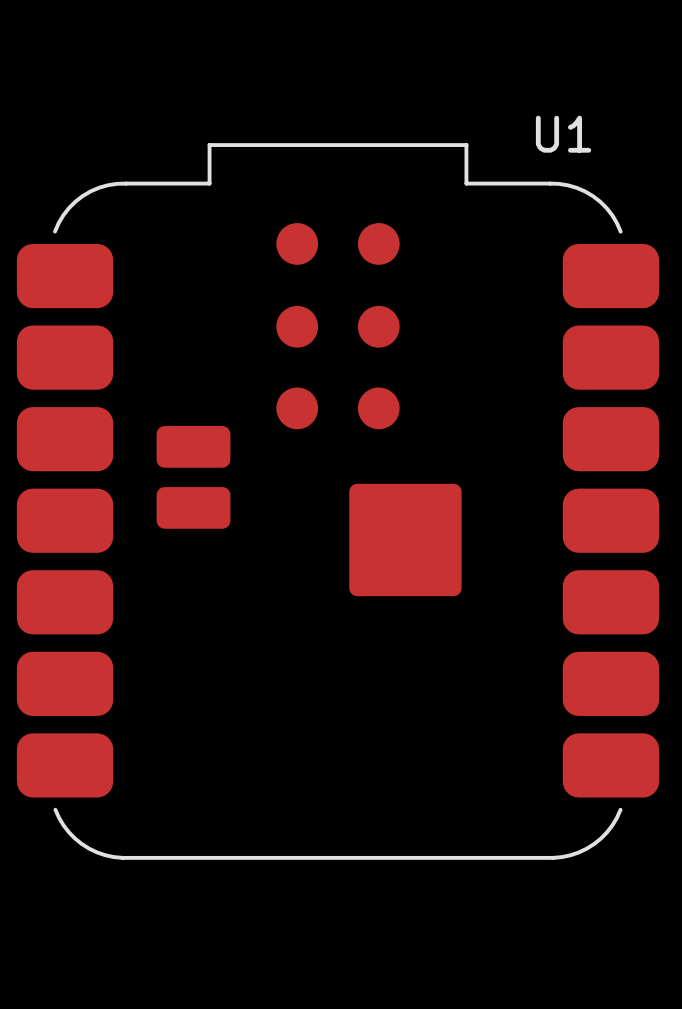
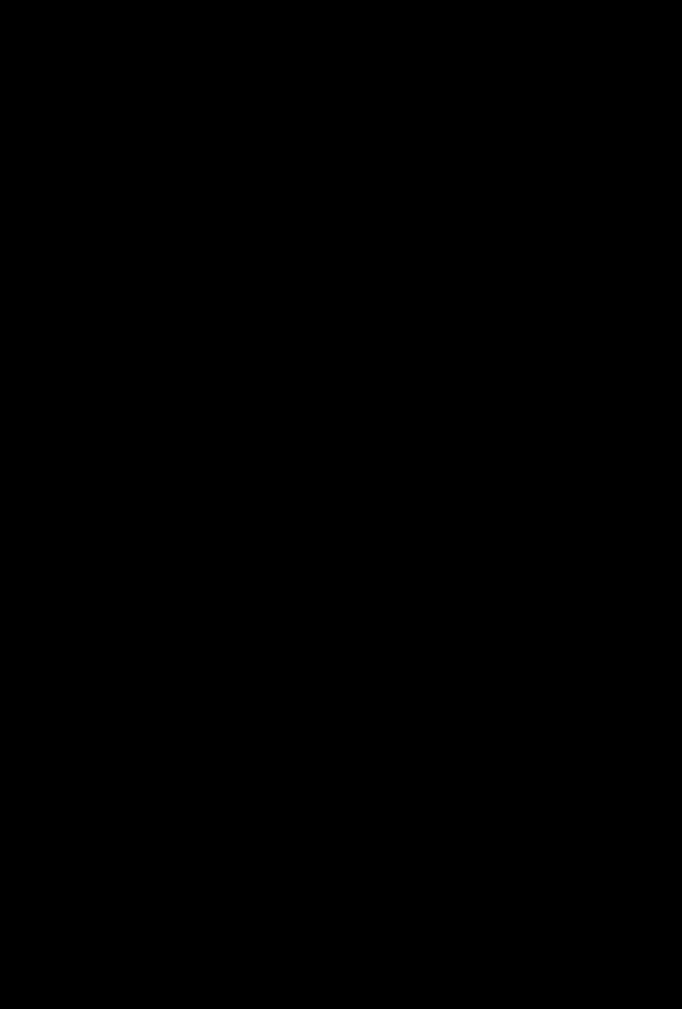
U1: (337, 501) -> none

